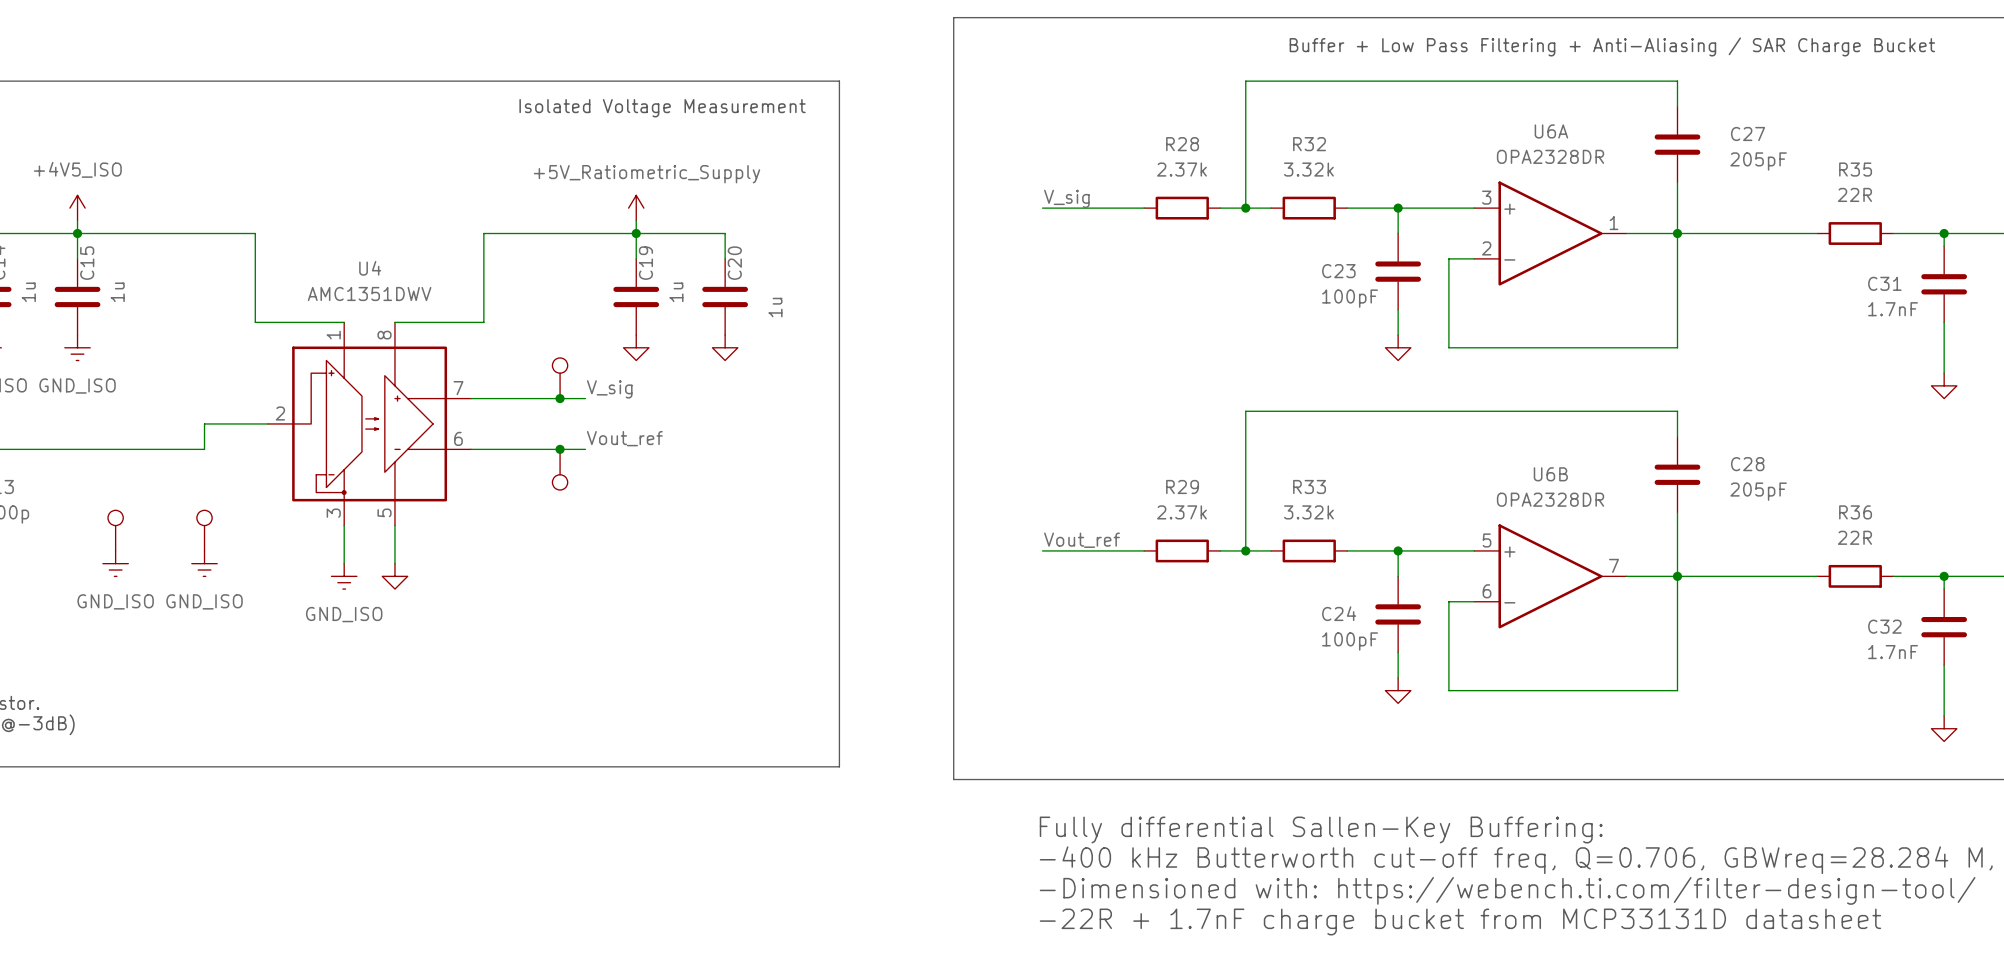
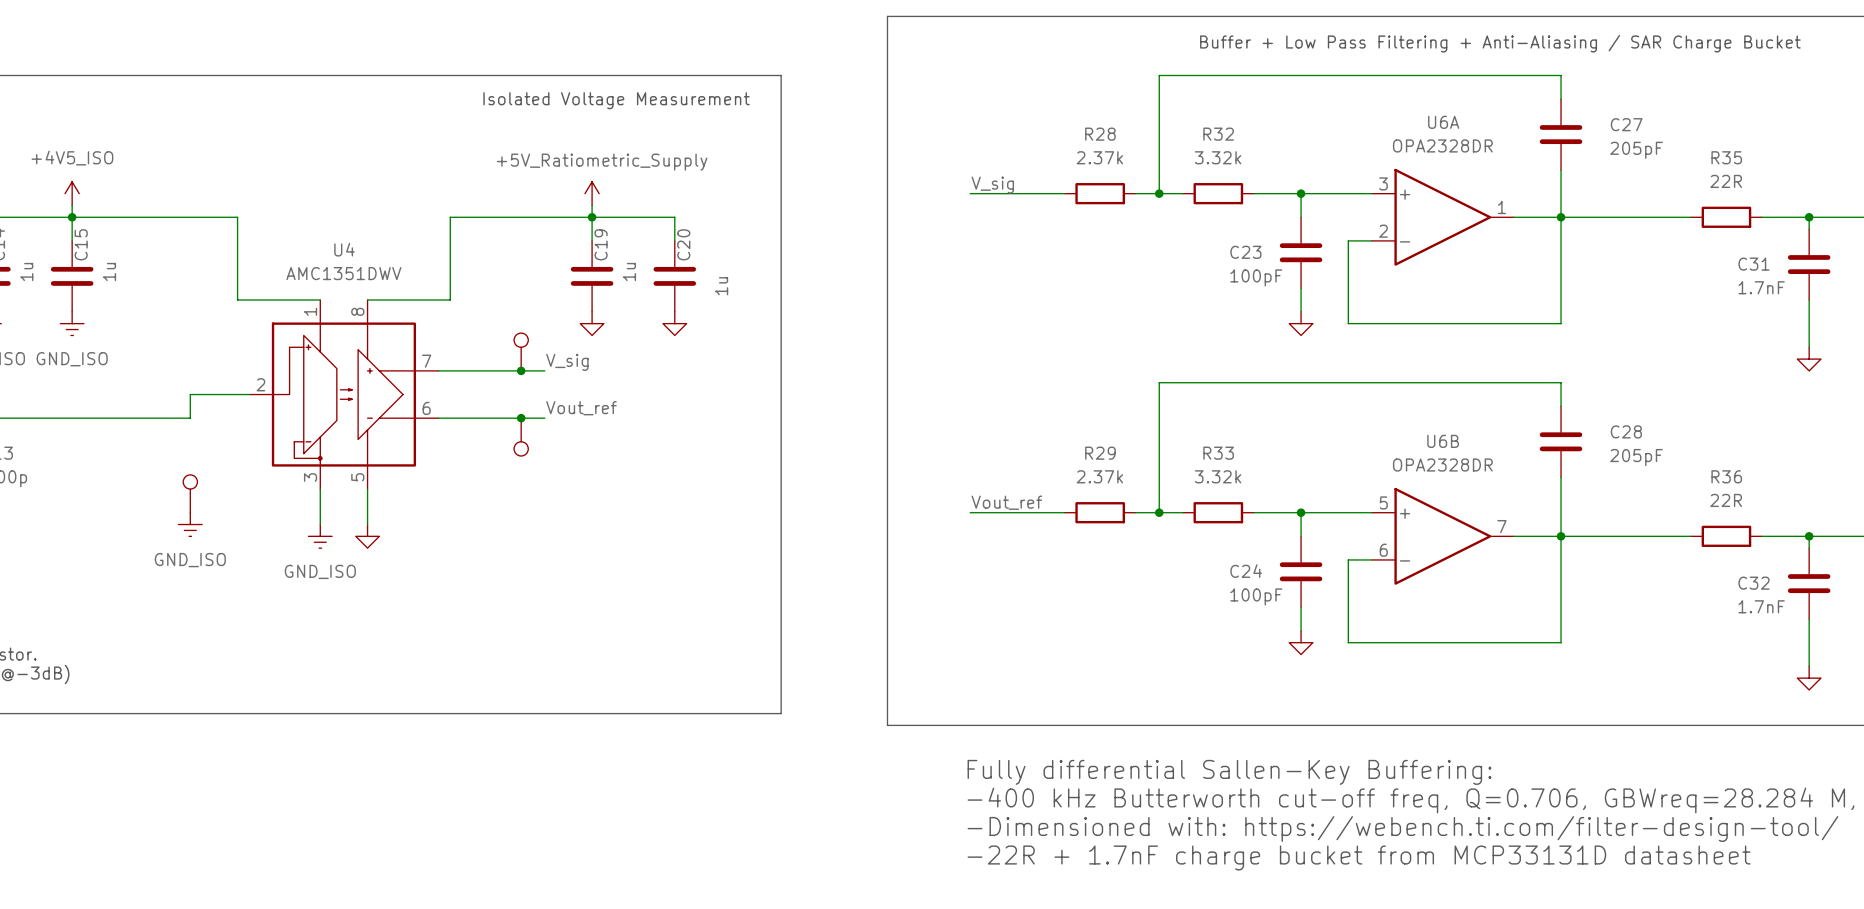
part: (115, 530) -> none
power symbol: GND_ISO (115, 563) -> none

